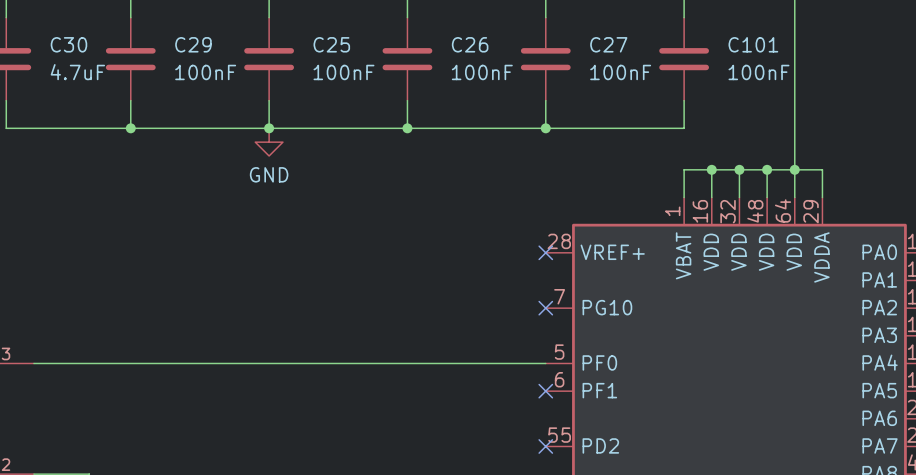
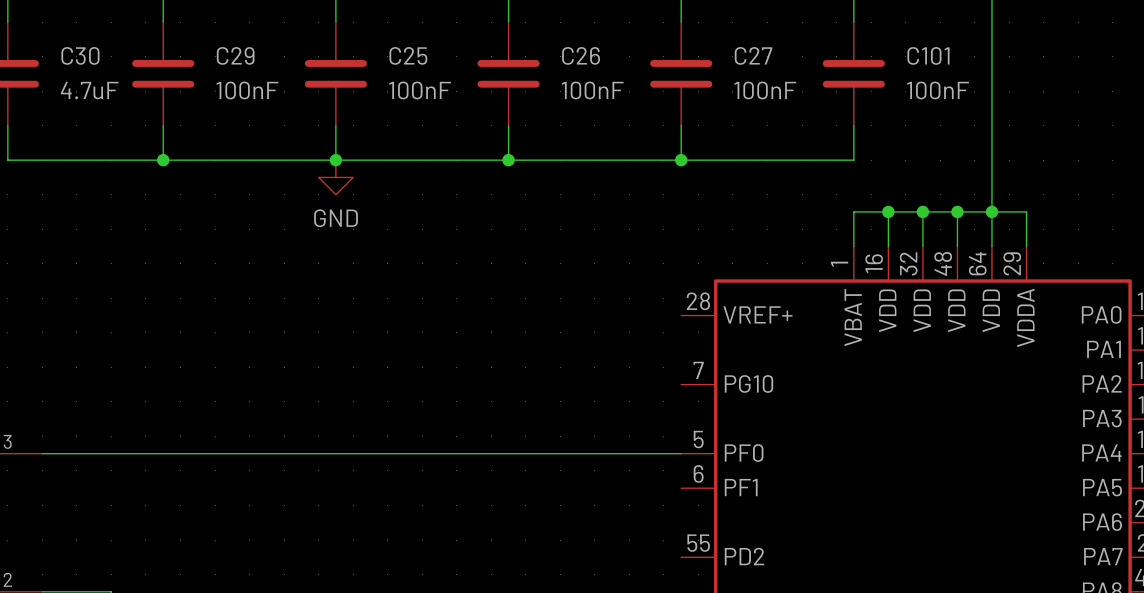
no-connect mark: (545, 252) -> none
no-connect mark: (545, 308) -> none
no-connect mark: (545, 391) -> none
no-connect mark: (545, 446) -> none

